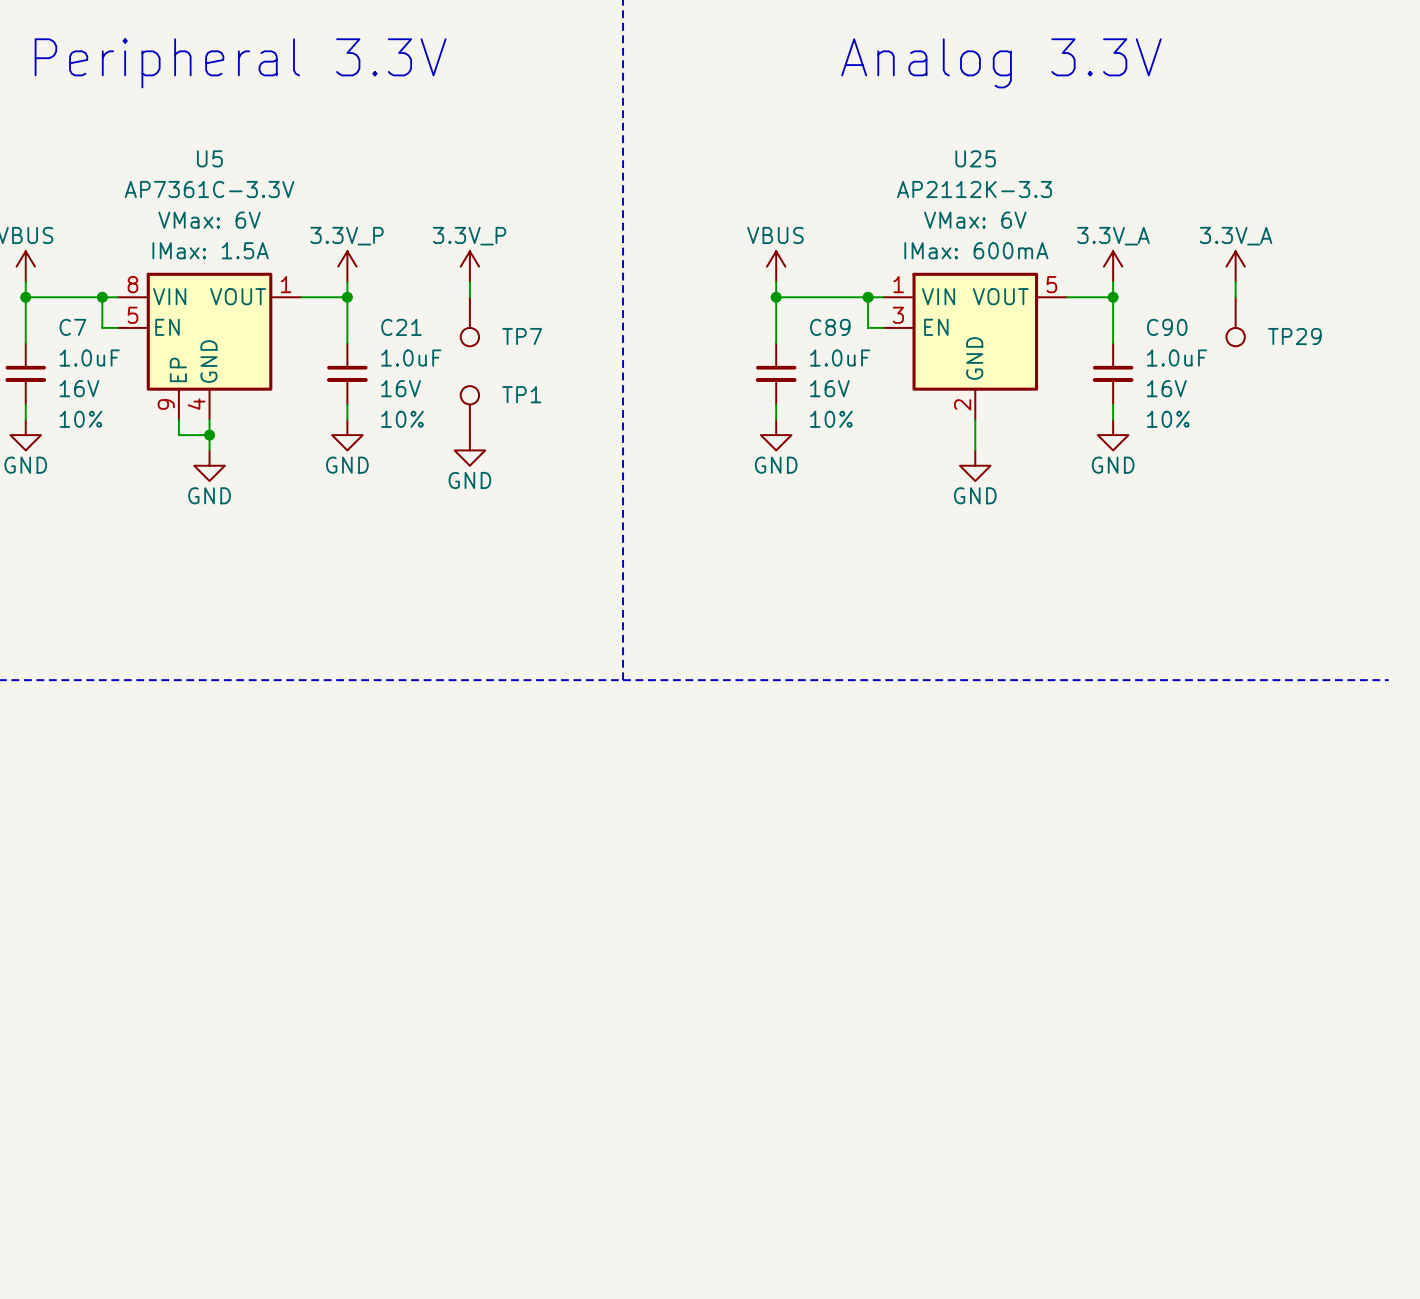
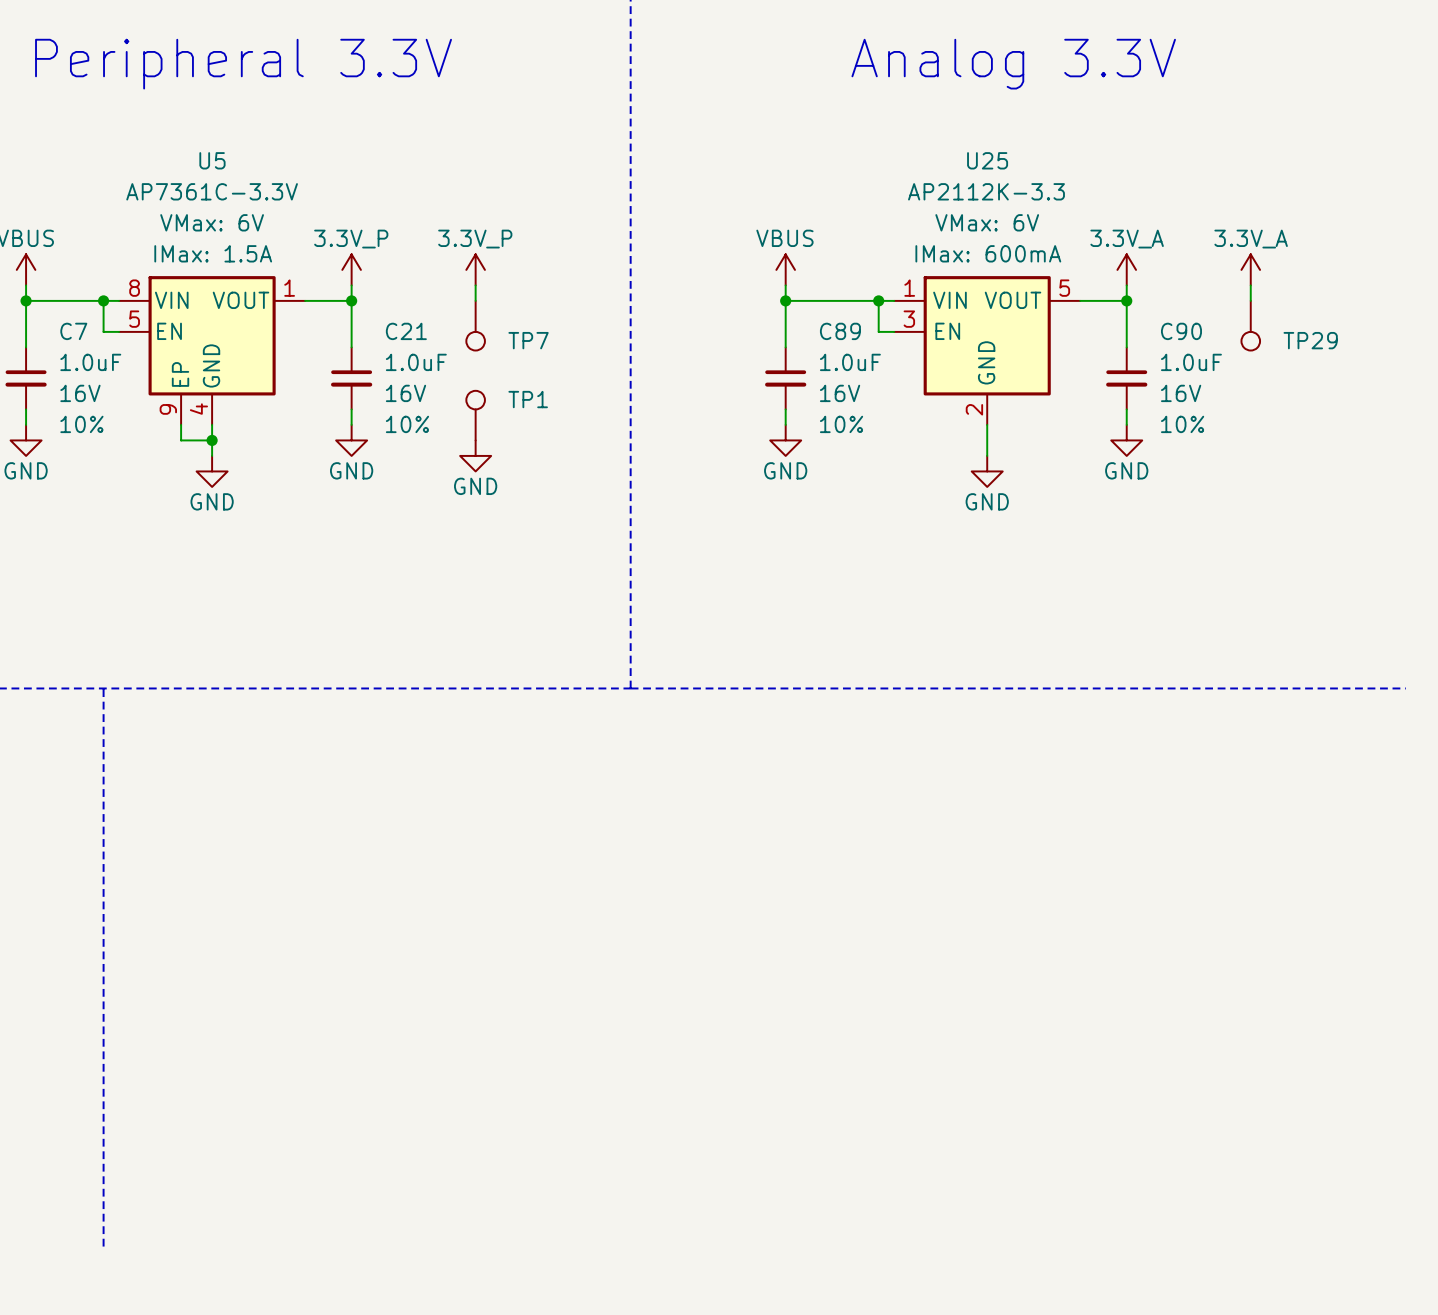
line: none -> (103, 688) (103, 1246)

